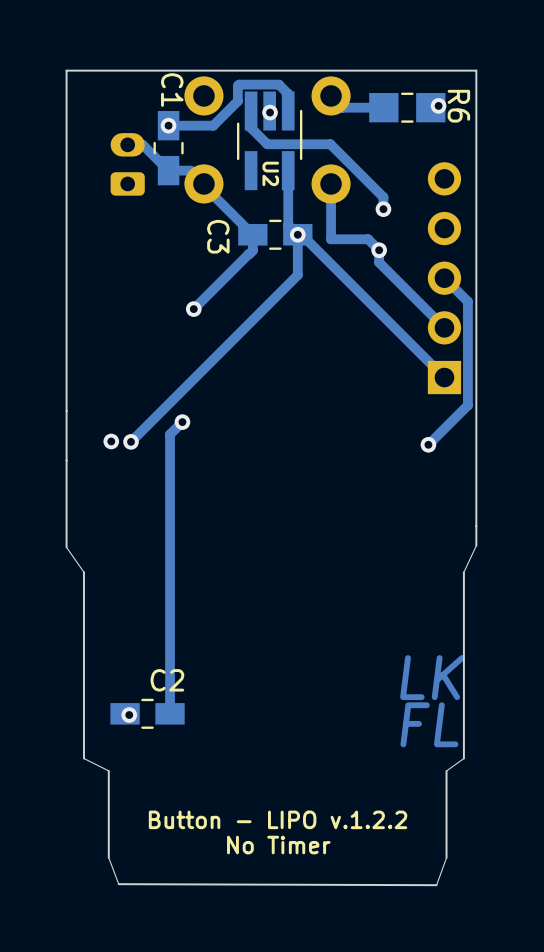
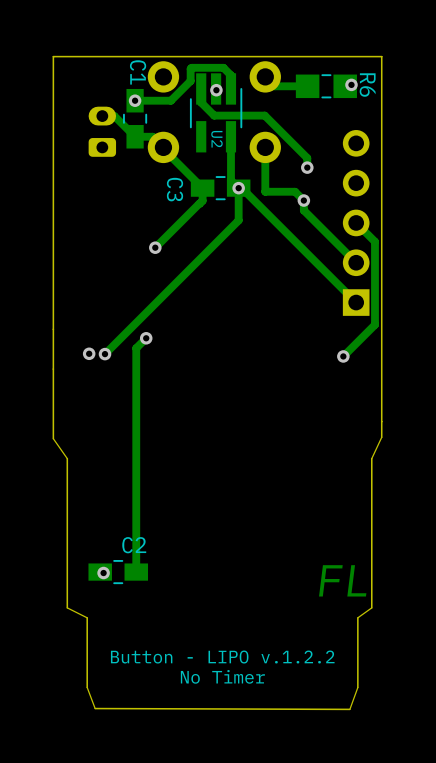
text: LK (432, 677) -> none

